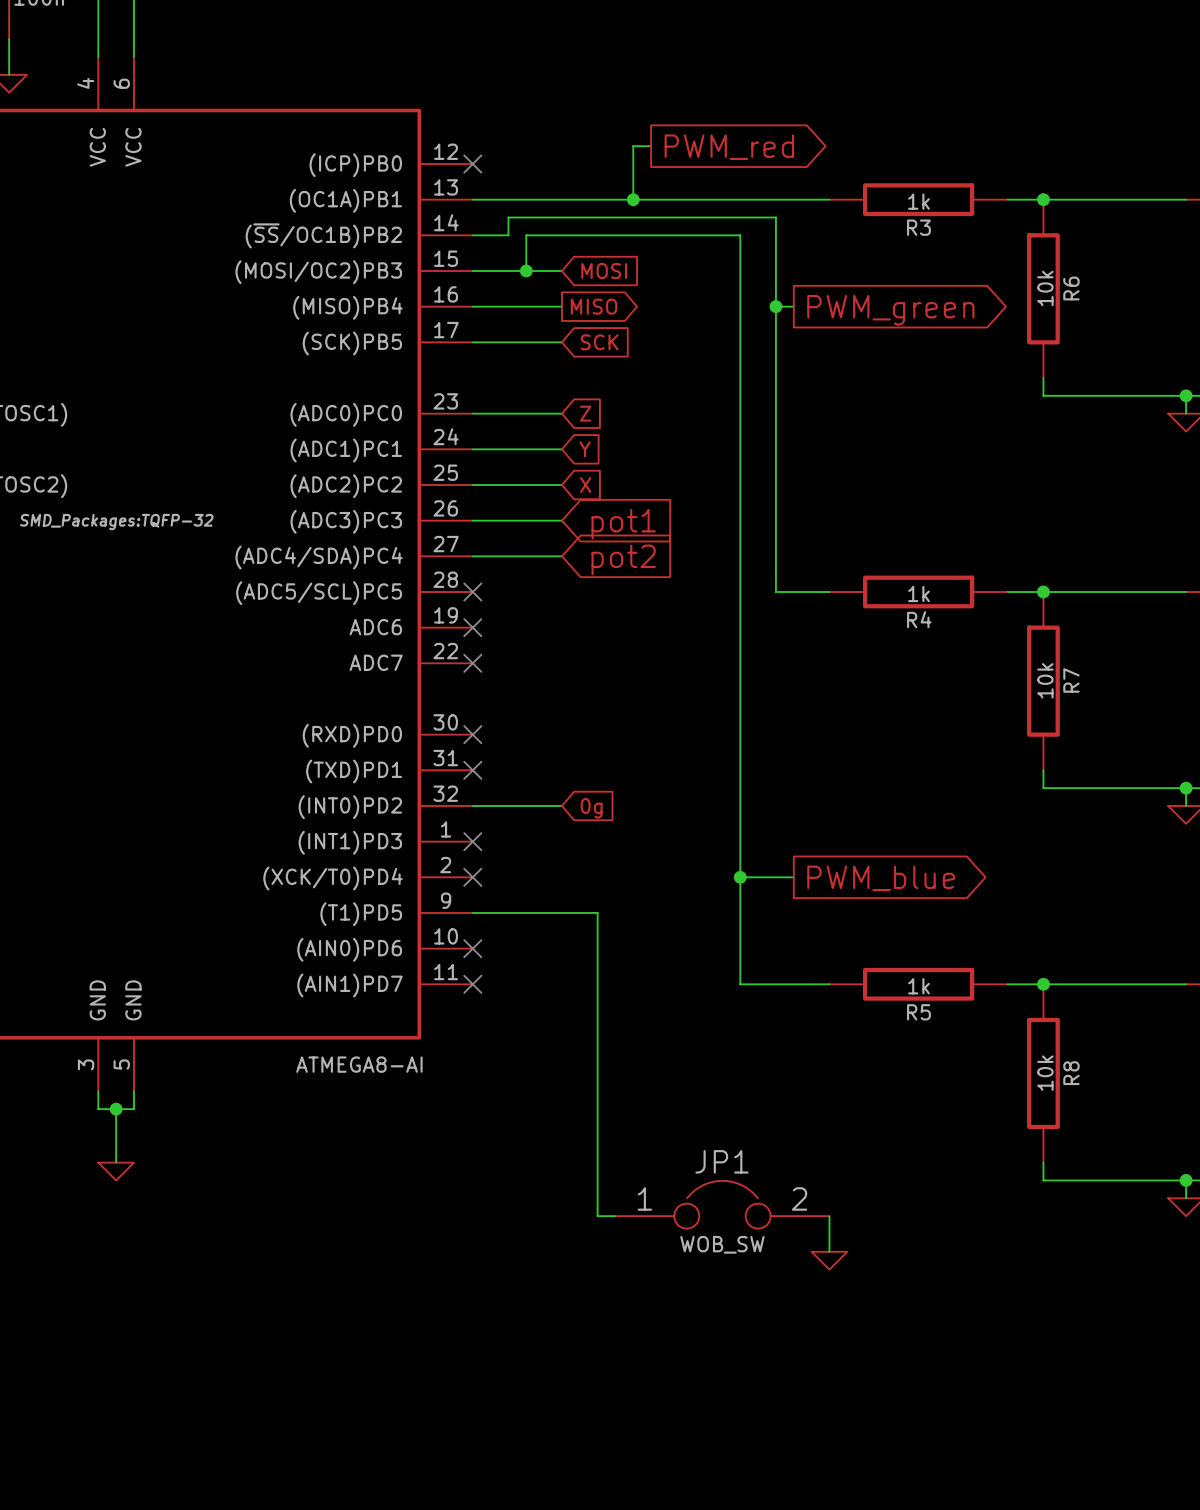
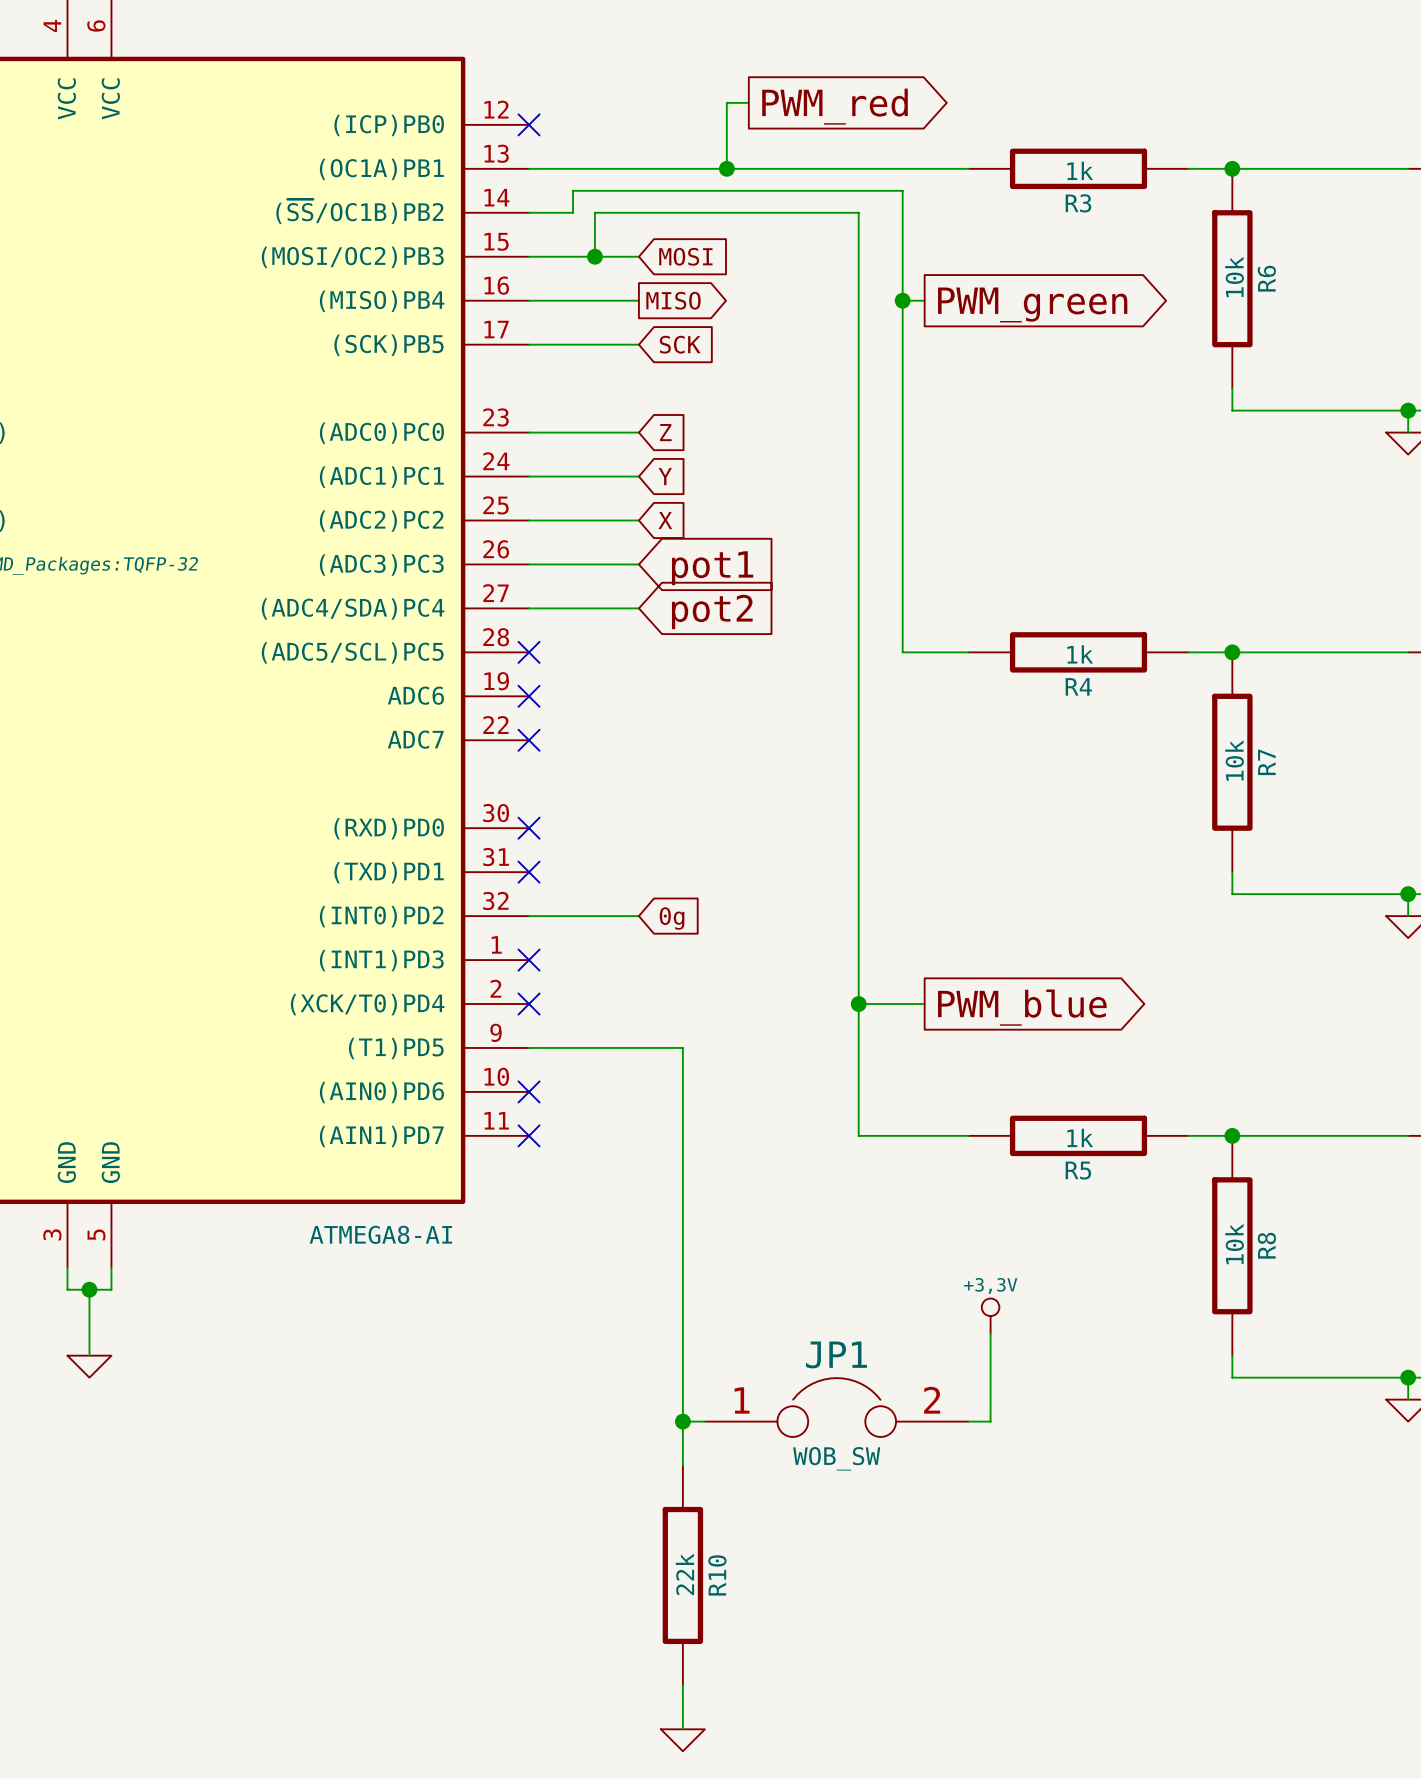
power symbol: none -> +3,3V (990, 1316)
wire: none -> (682, 1421) (682, 1465)
junction: none -> (682, 1421)
wire: (829, 1216) (829, 1251) -> (968, 1421) (990, 1421) (990, 1333)
power symbol position: (829, 1260) -> (682, 1740)
R10: none -> 22k (682, 1575)
wire: none -> (682, 1685) (682, 1729)

